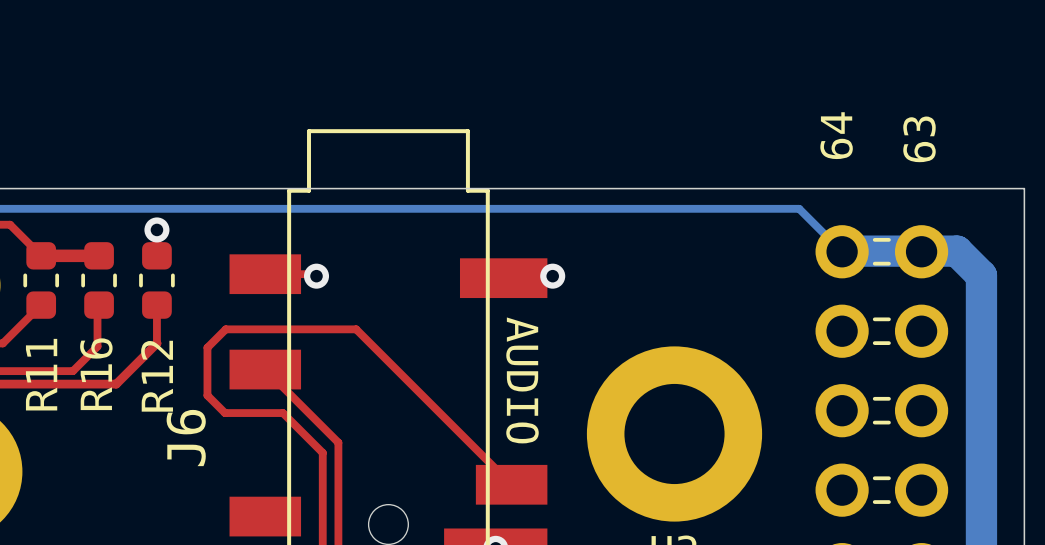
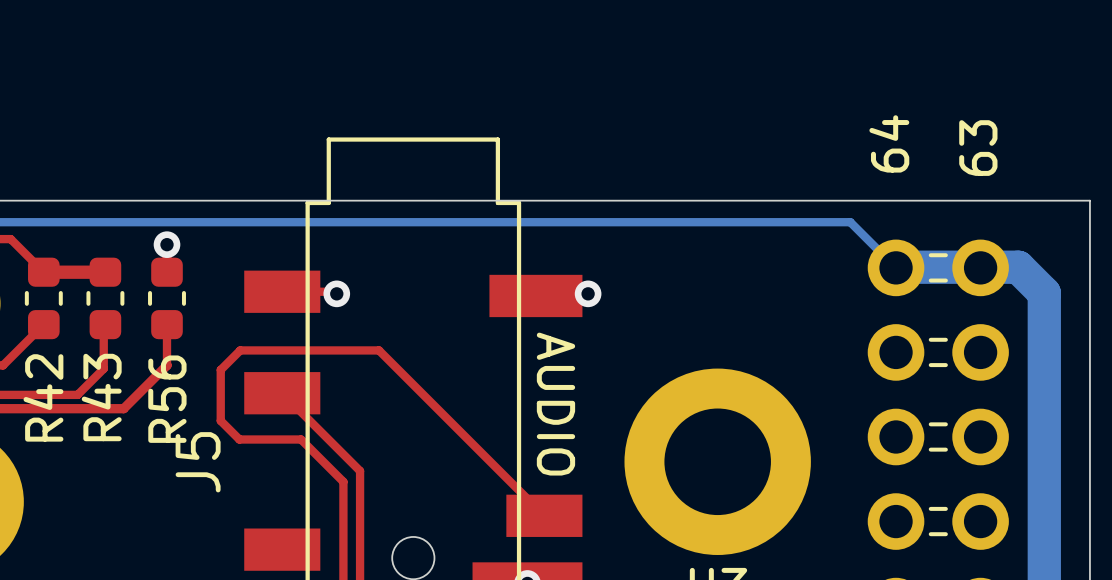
R11 name: R11 (41, 374) -> R42 (43, 397)
R16 name: R16 (96, 374) -> R43 (101, 397)
R12 name: R12 (157, 376) -> R56 (167, 399)
J6 name: J6 (186, 438) -> J5 (198, 462)

